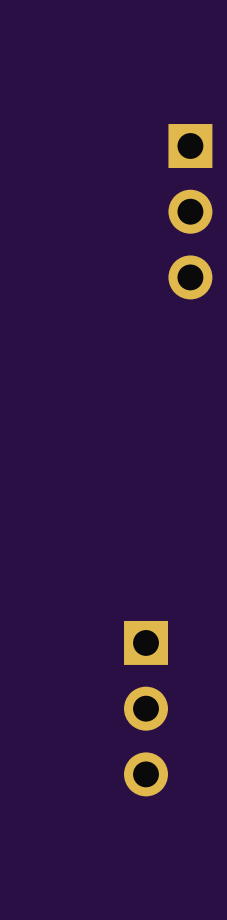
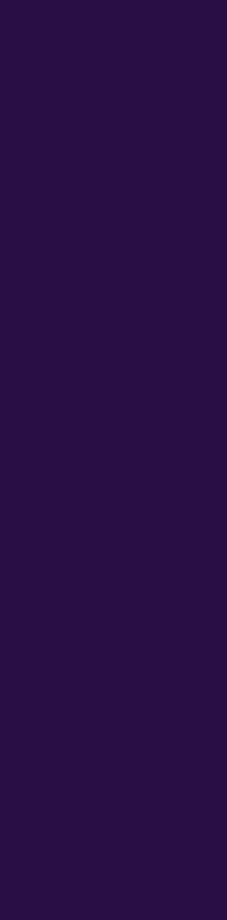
part: (190, 211) -> none
part: (146, 708) -> none

